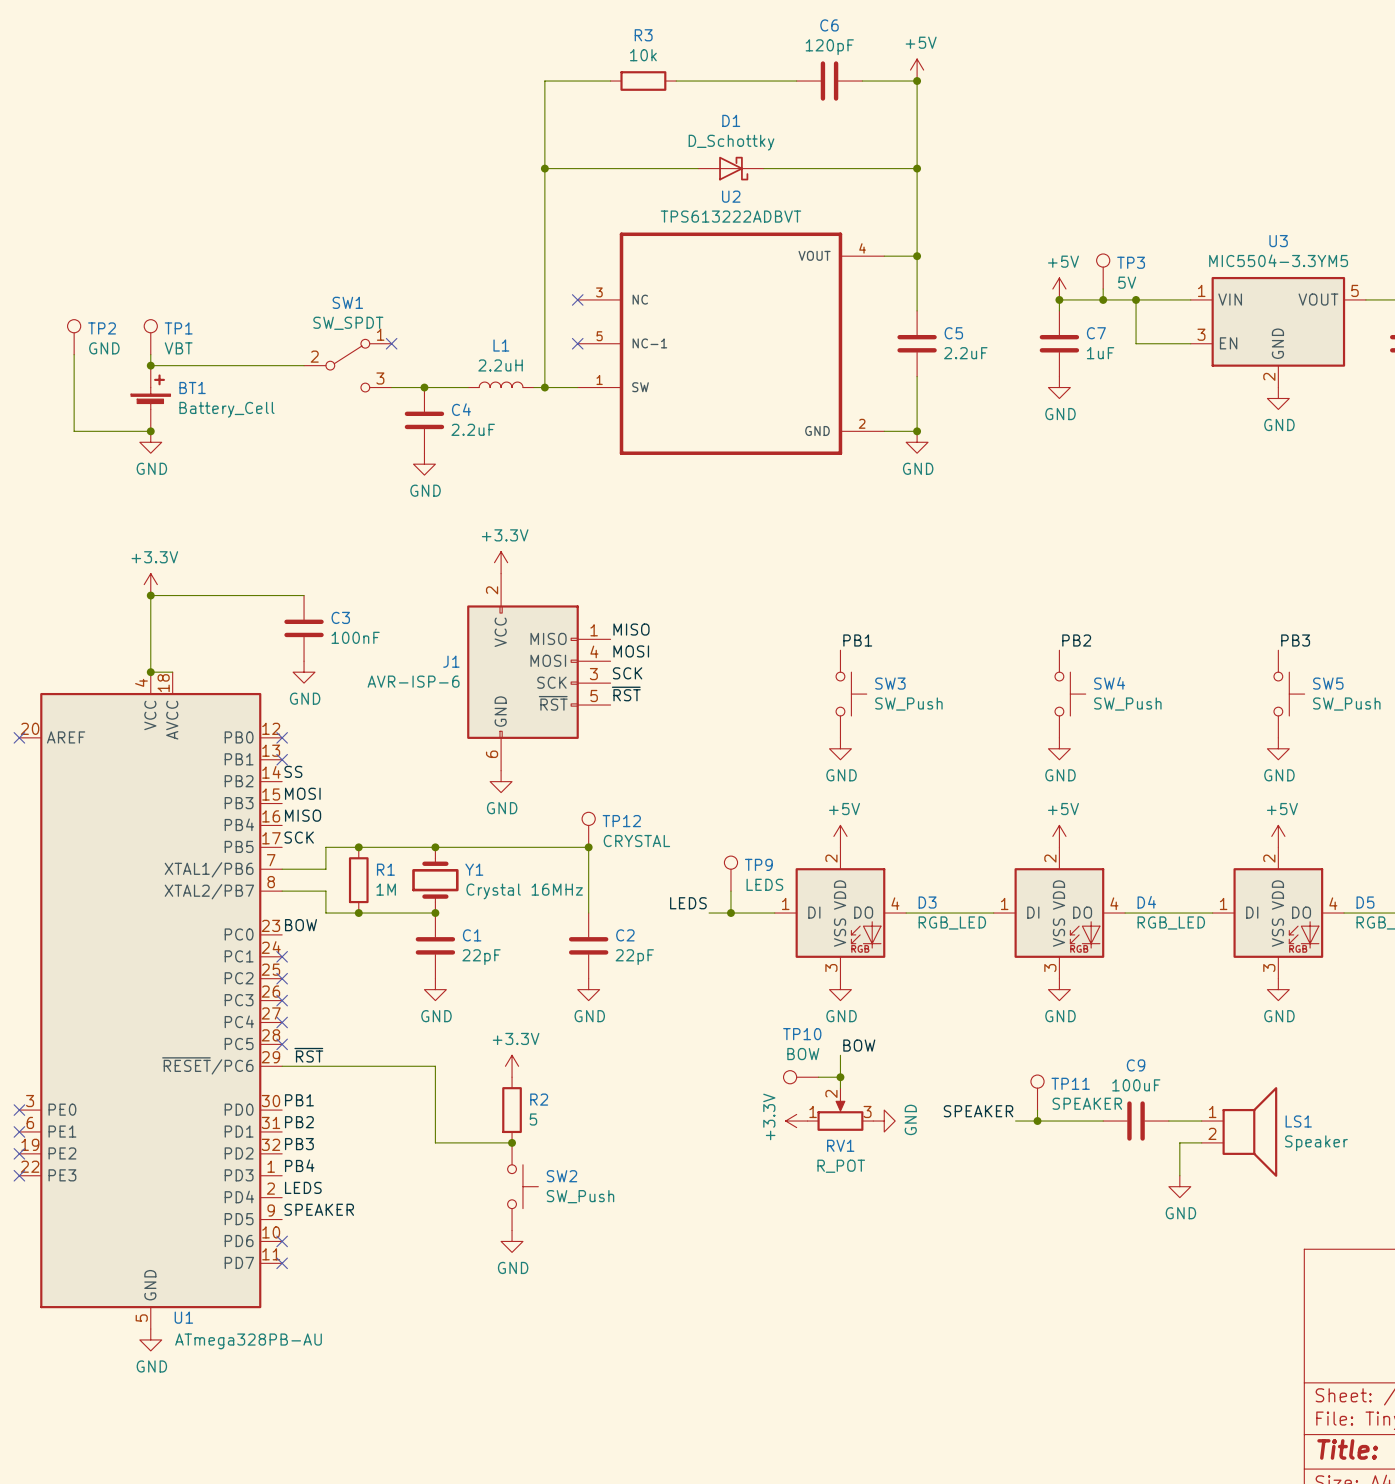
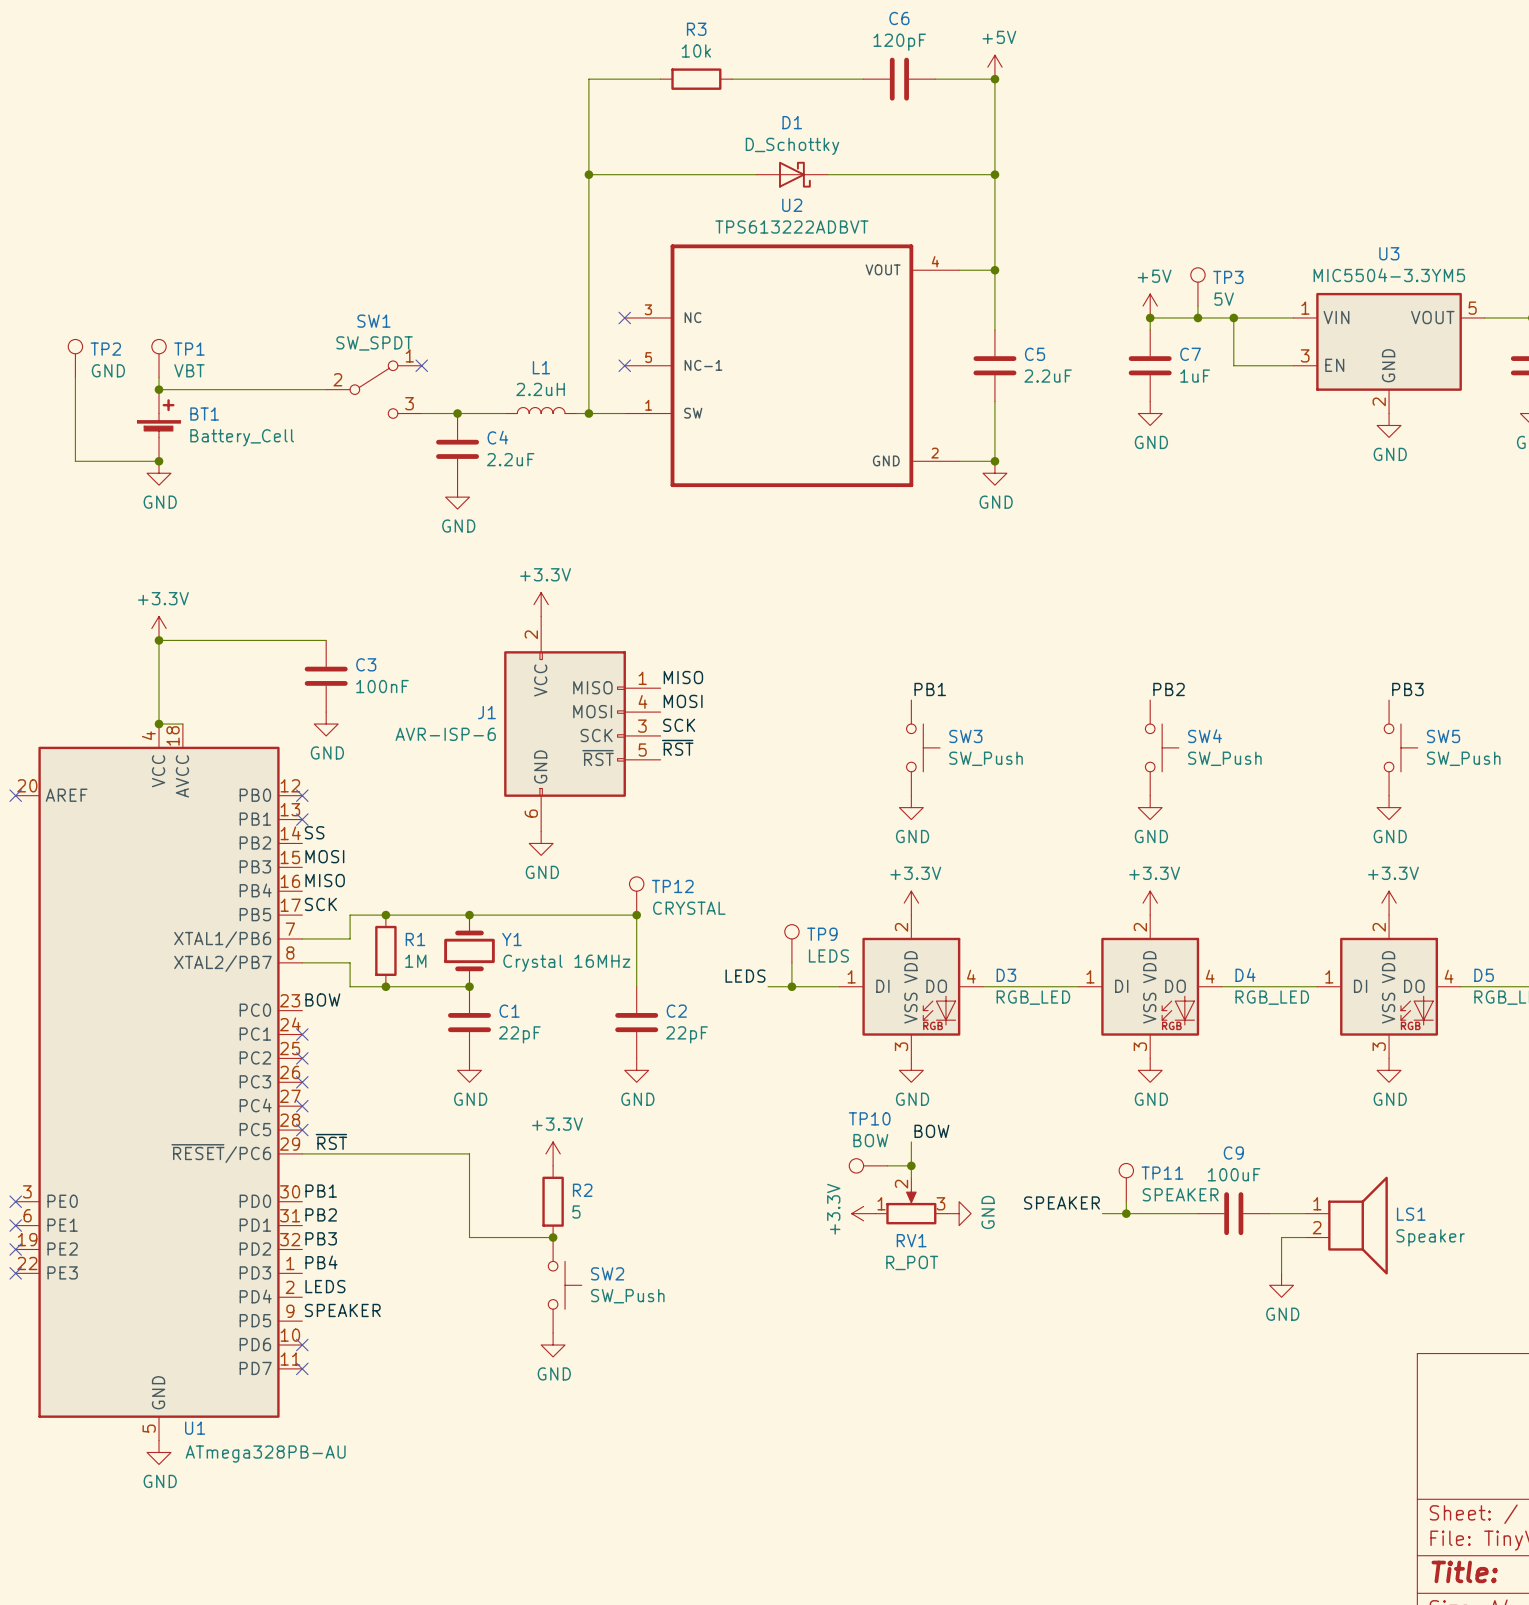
power symbol: +5V (840, 836) -> +3.3V (911, 903)
power symbol: +5V (1059, 836) -> +3.3V (1150, 903)
power symbol: +5V (1278, 836) -> +3.3V (1389, 903)

